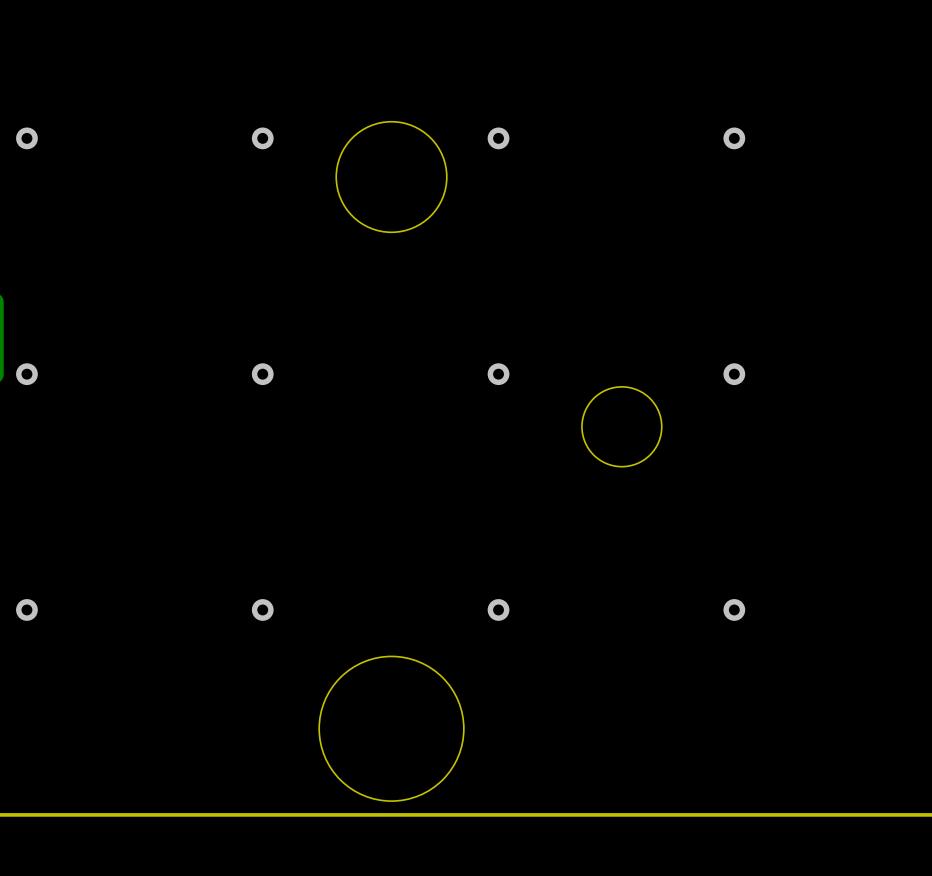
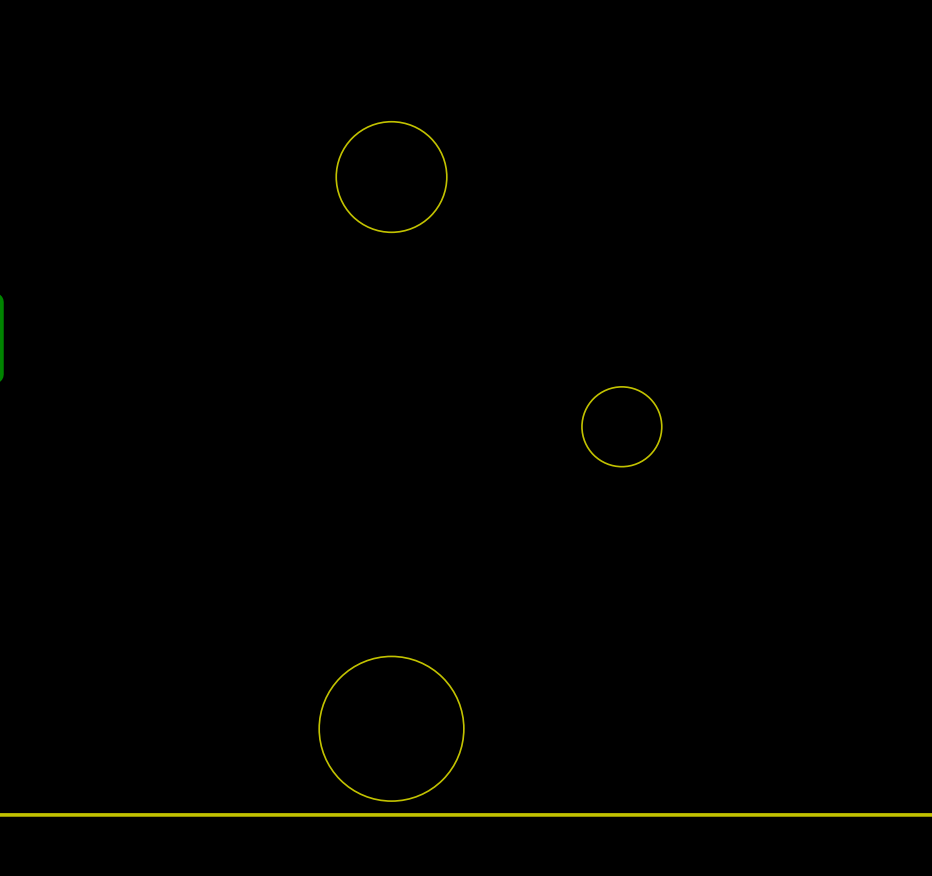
via: (26, 138) -> none
via: (262, 138) -> none
via: (498, 138) -> none
via: (734, 138) -> none
via: (26, 374) -> none
via: (262, 374) -> none
via: (498, 374) -> none
via: (734, 374) -> none
via: (26, 609) -> none
via: (262, 609) -> none
via: (498, 609) -> none
via: (734, 609) -> none

